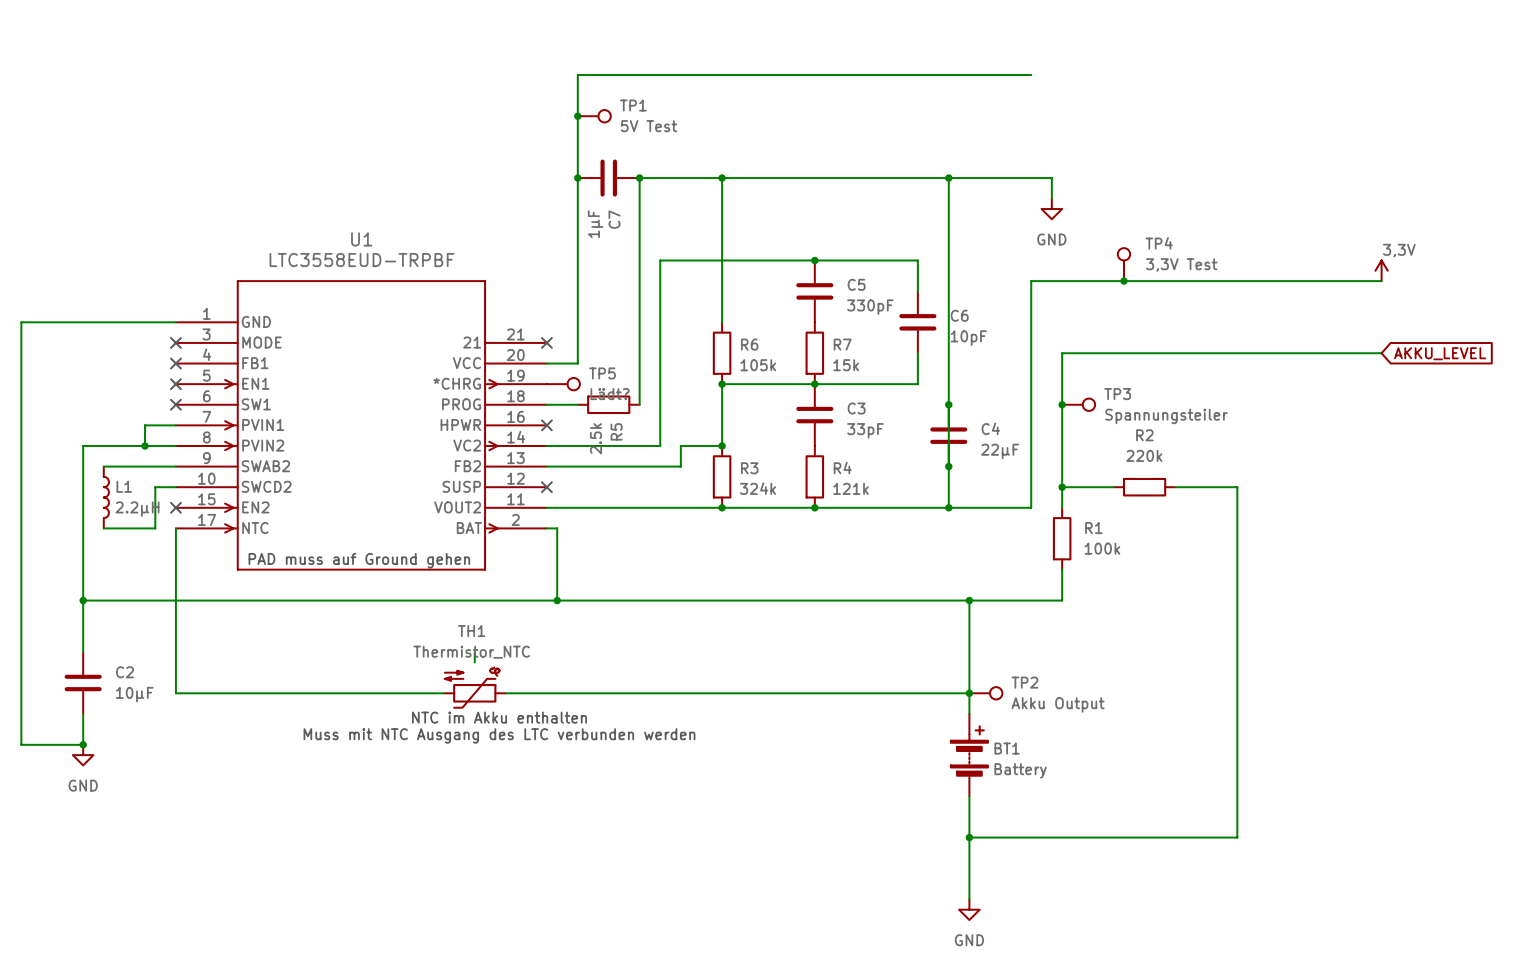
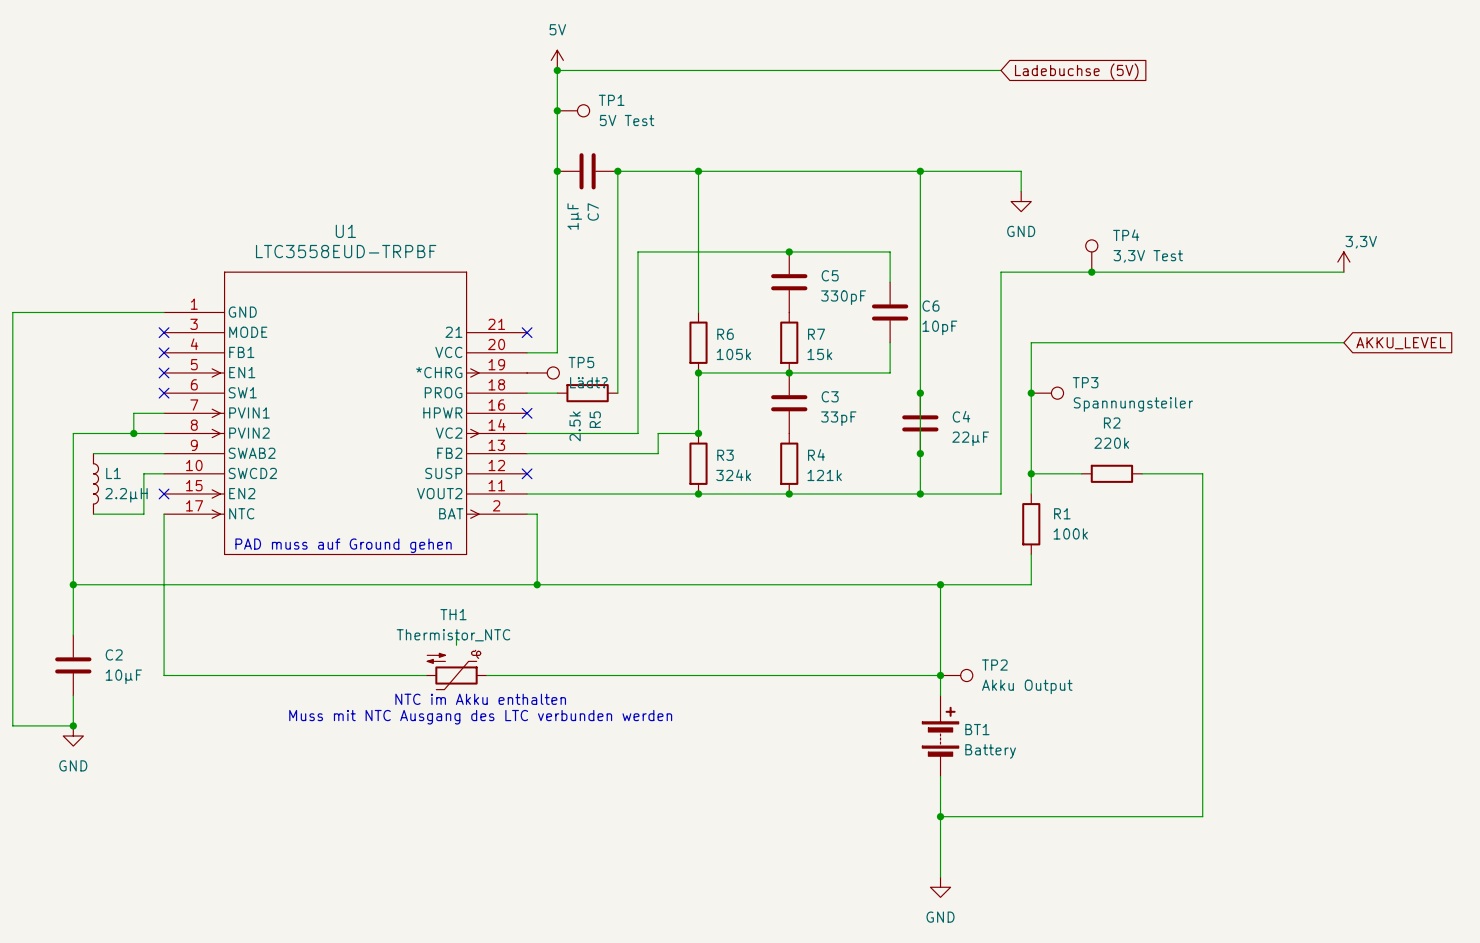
power symbol: none -> 5V (557, 60)
junction: none -> (557, 70)
global label: none -> Ladebuchse (5V) (1076, 71)

